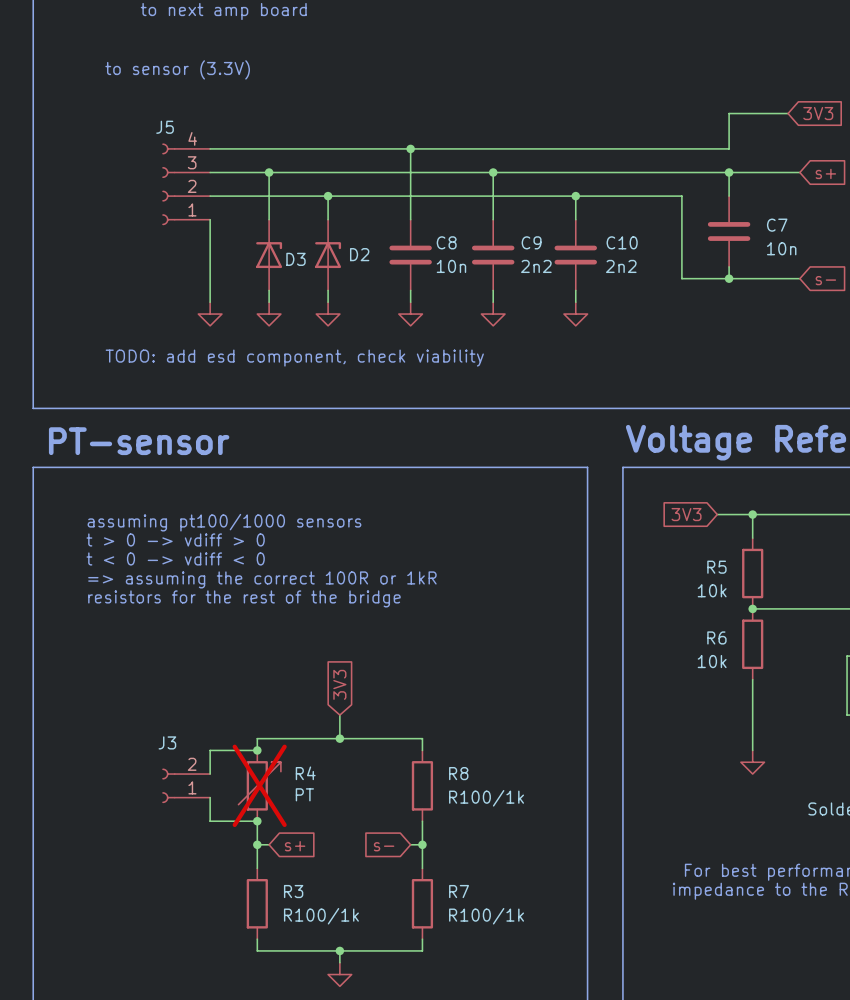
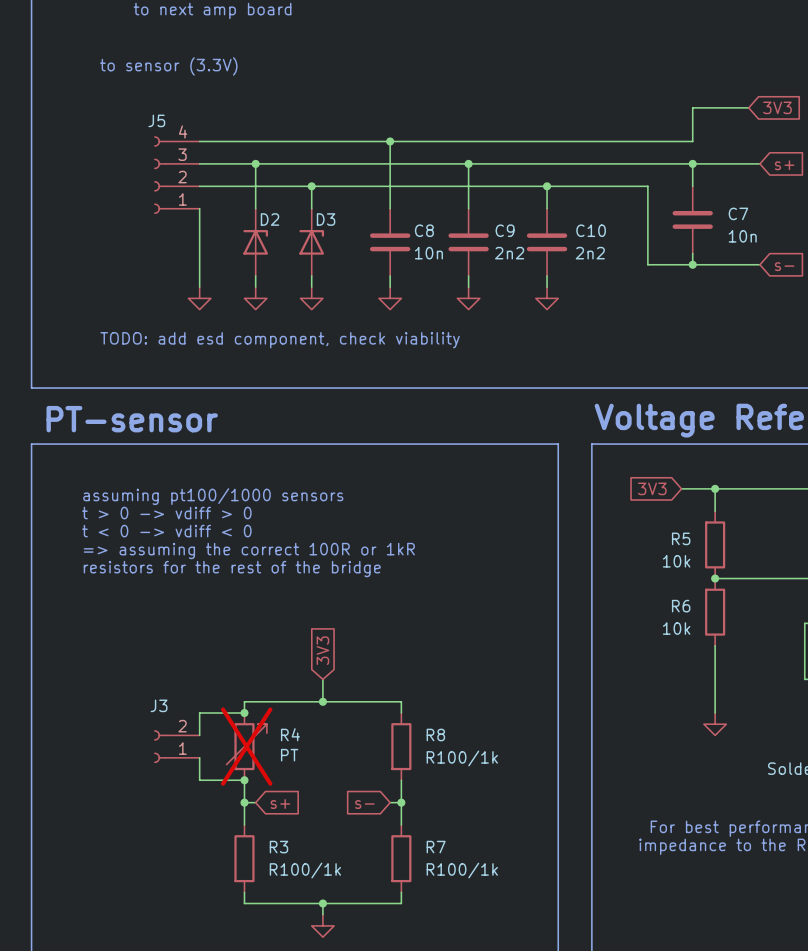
D2 name: D2 (359, 254) -> D3 (326, 219)
D3 name: D3 (295, 259) -> D2 (270, 219)

